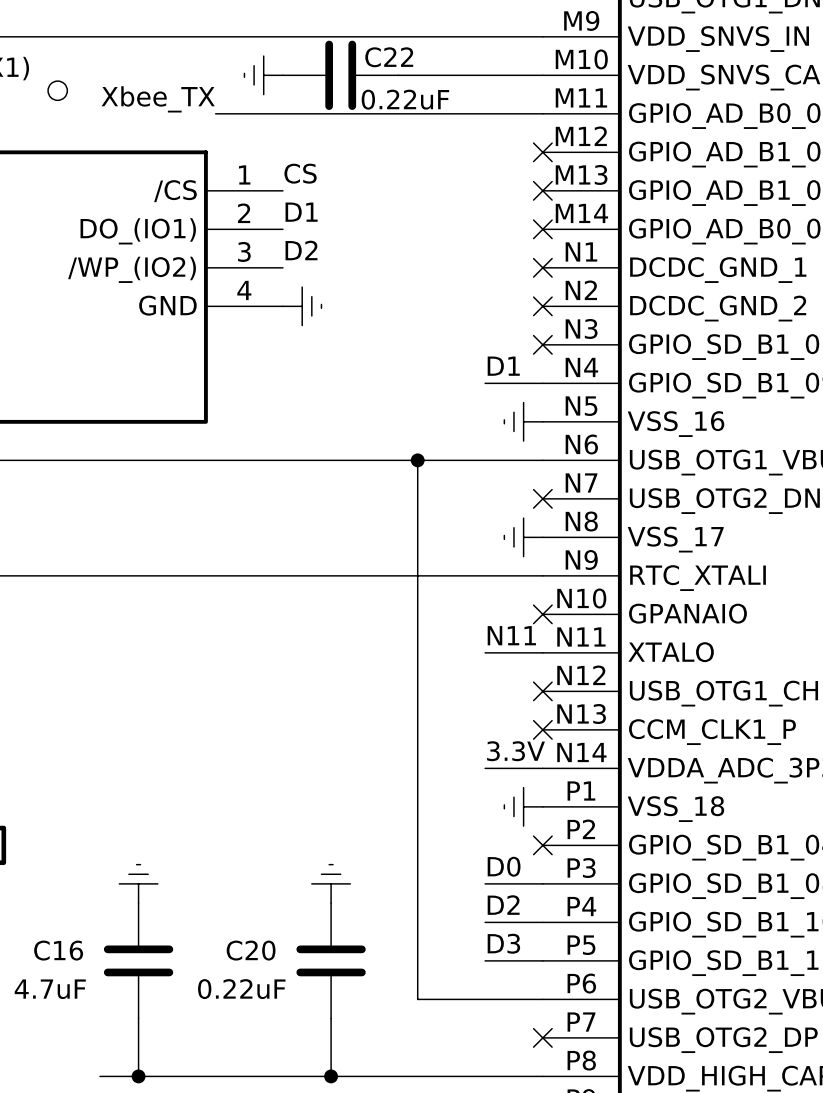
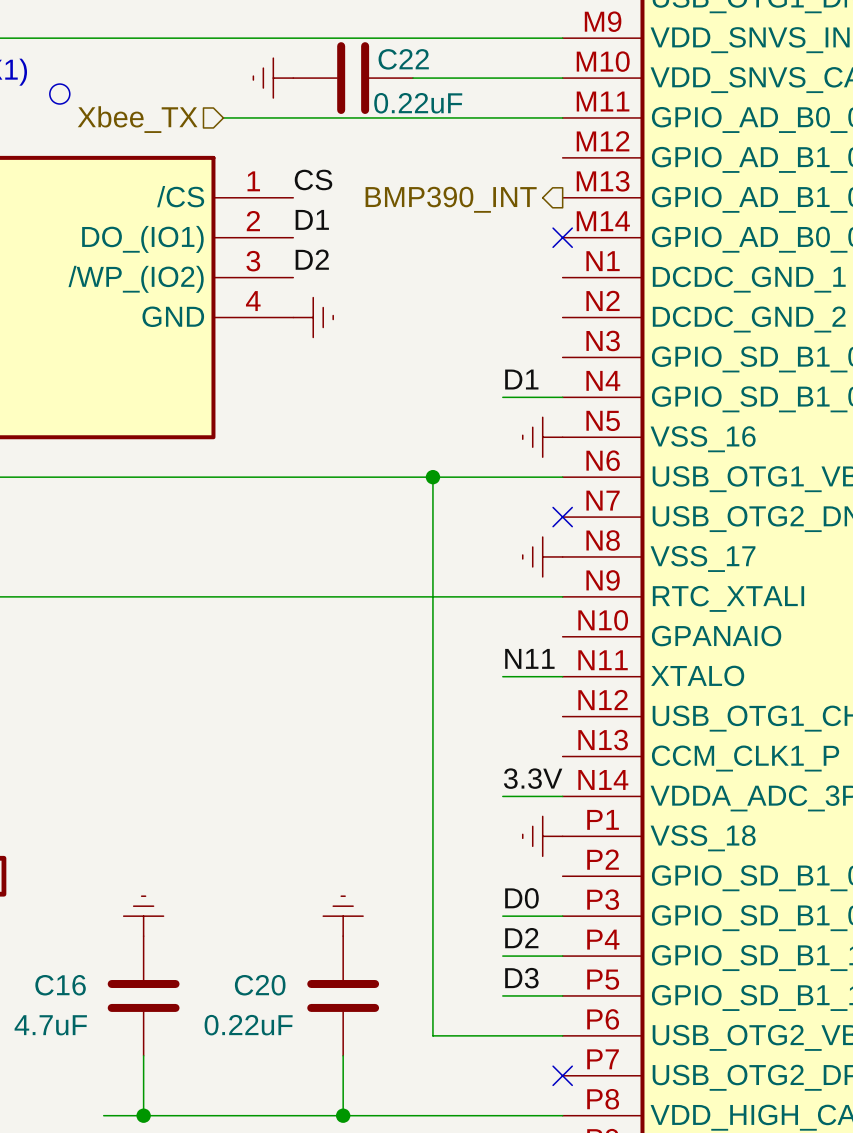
label: Xbee_TX (158, 99) -> none
hierarchical label: none -> Xbee_TX (137, 119)
no-connect mark: (542, 152) -> none
no-connect mark: (542, 190) -> none
hierarchical label: none -> BMP390_INT (451, 199)
no-connect mark: (542, 267) -> none
no-connect mark: (542, 306) -> none
no-connect mark: (542, 344) -> none
no-connect mark: (542, 614) -> none
no-connect mark: (542, 691) -> none
no-connect mark: (542, 729) -> none
no-connect mark: (542, 845) -> none

